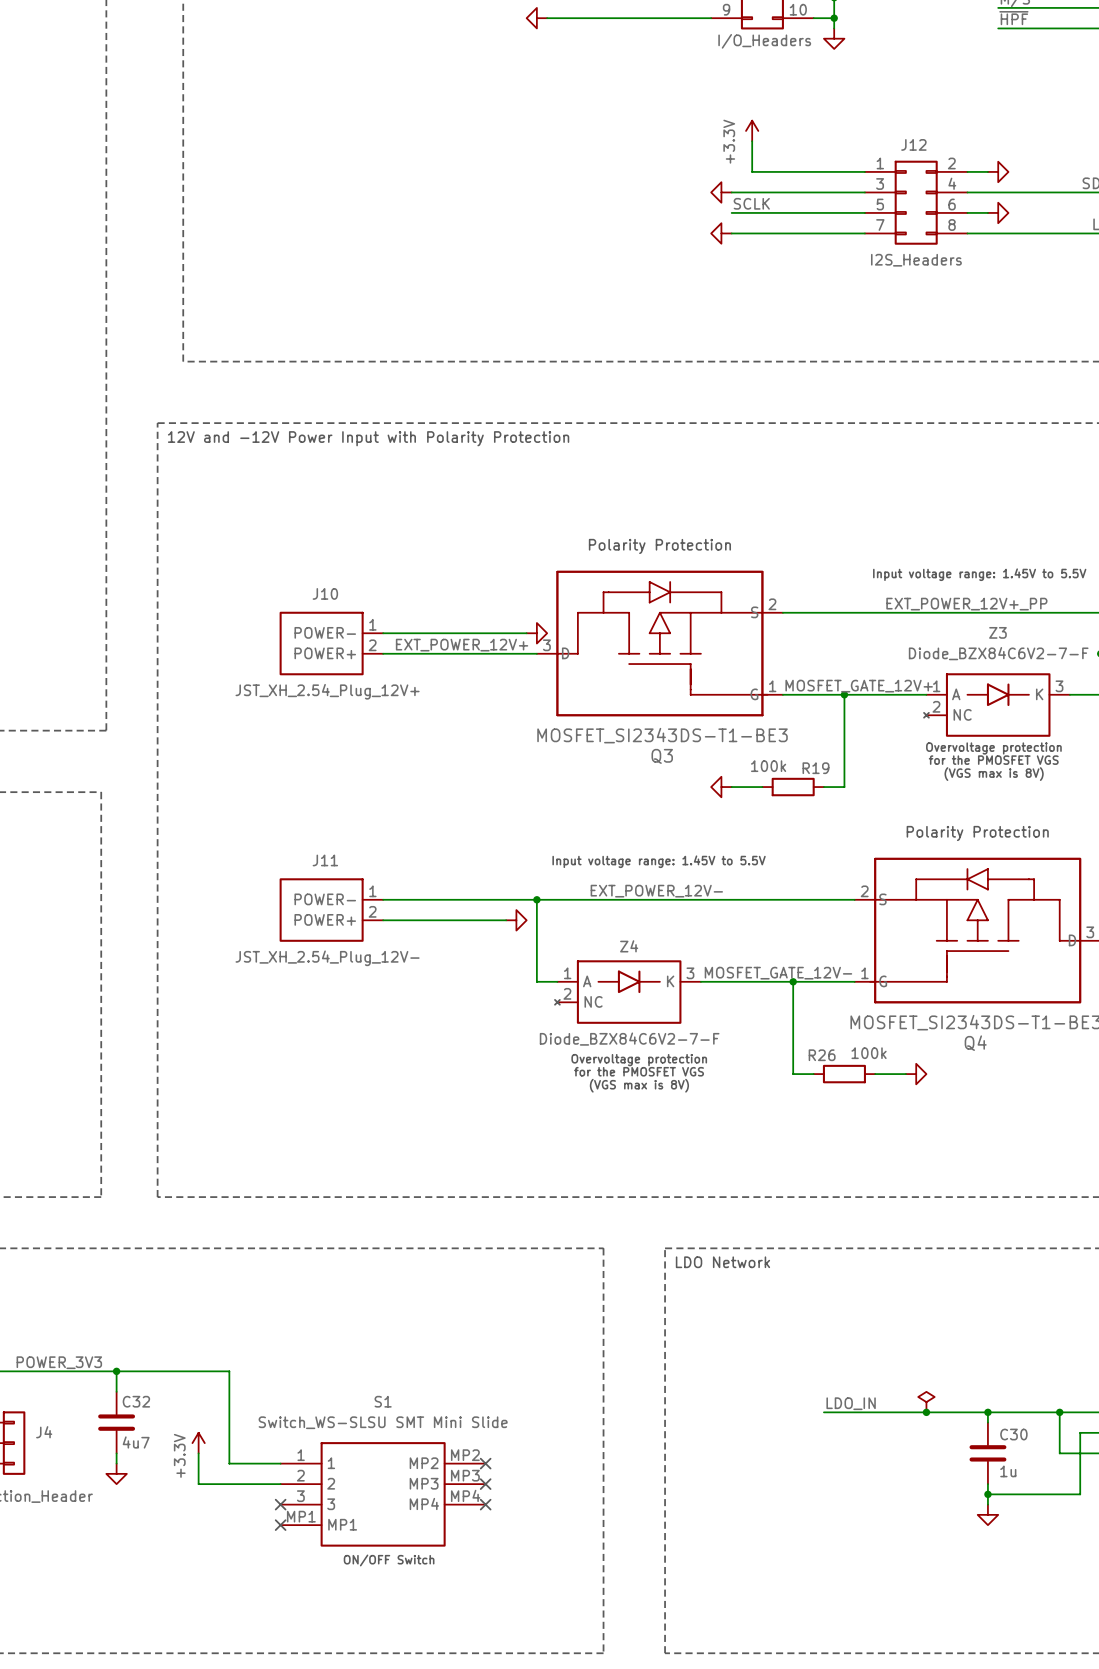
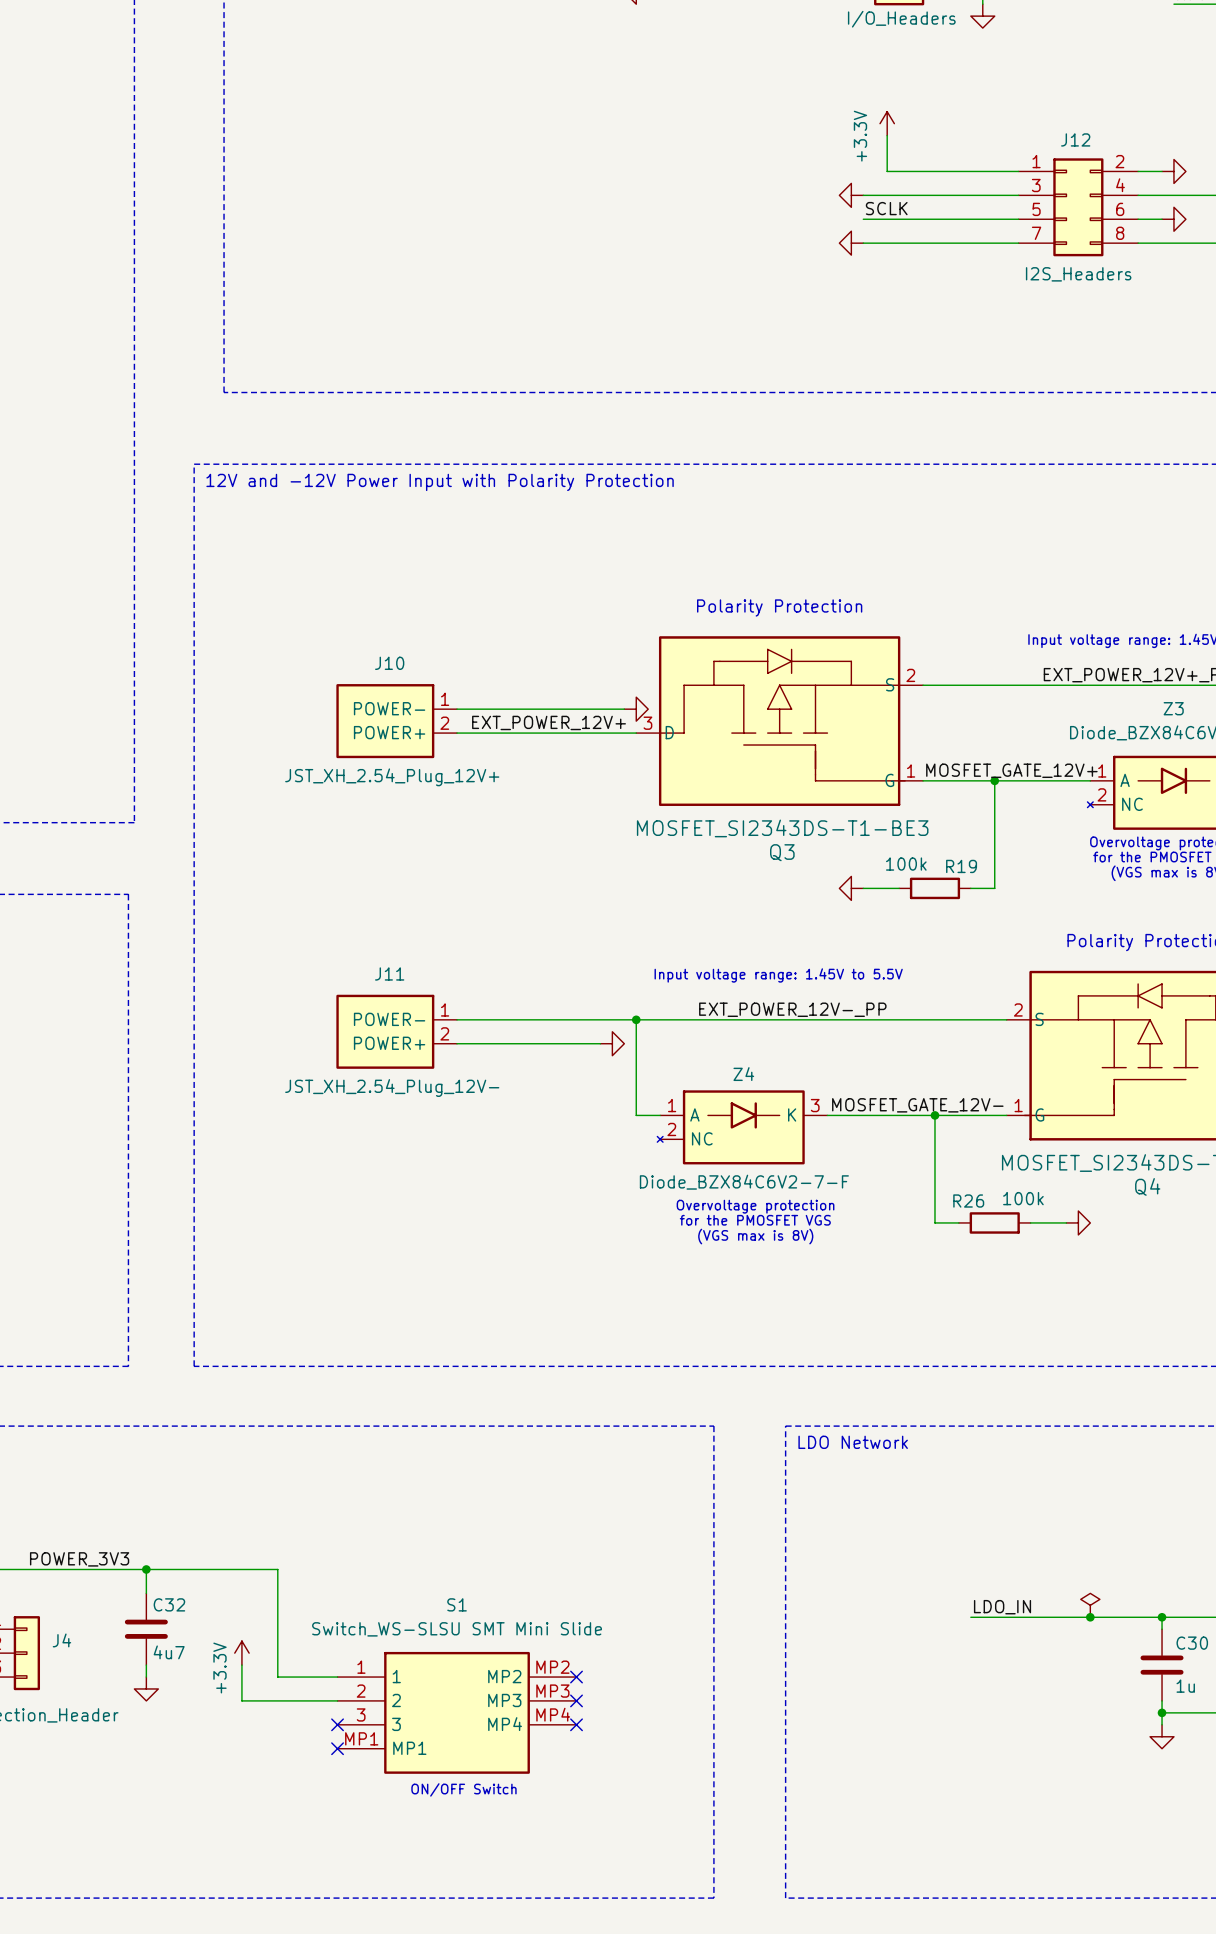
label: EXT_POWER_12V- (656, 891) -> EXT_POWER_12V-_PP (792, 1009)

